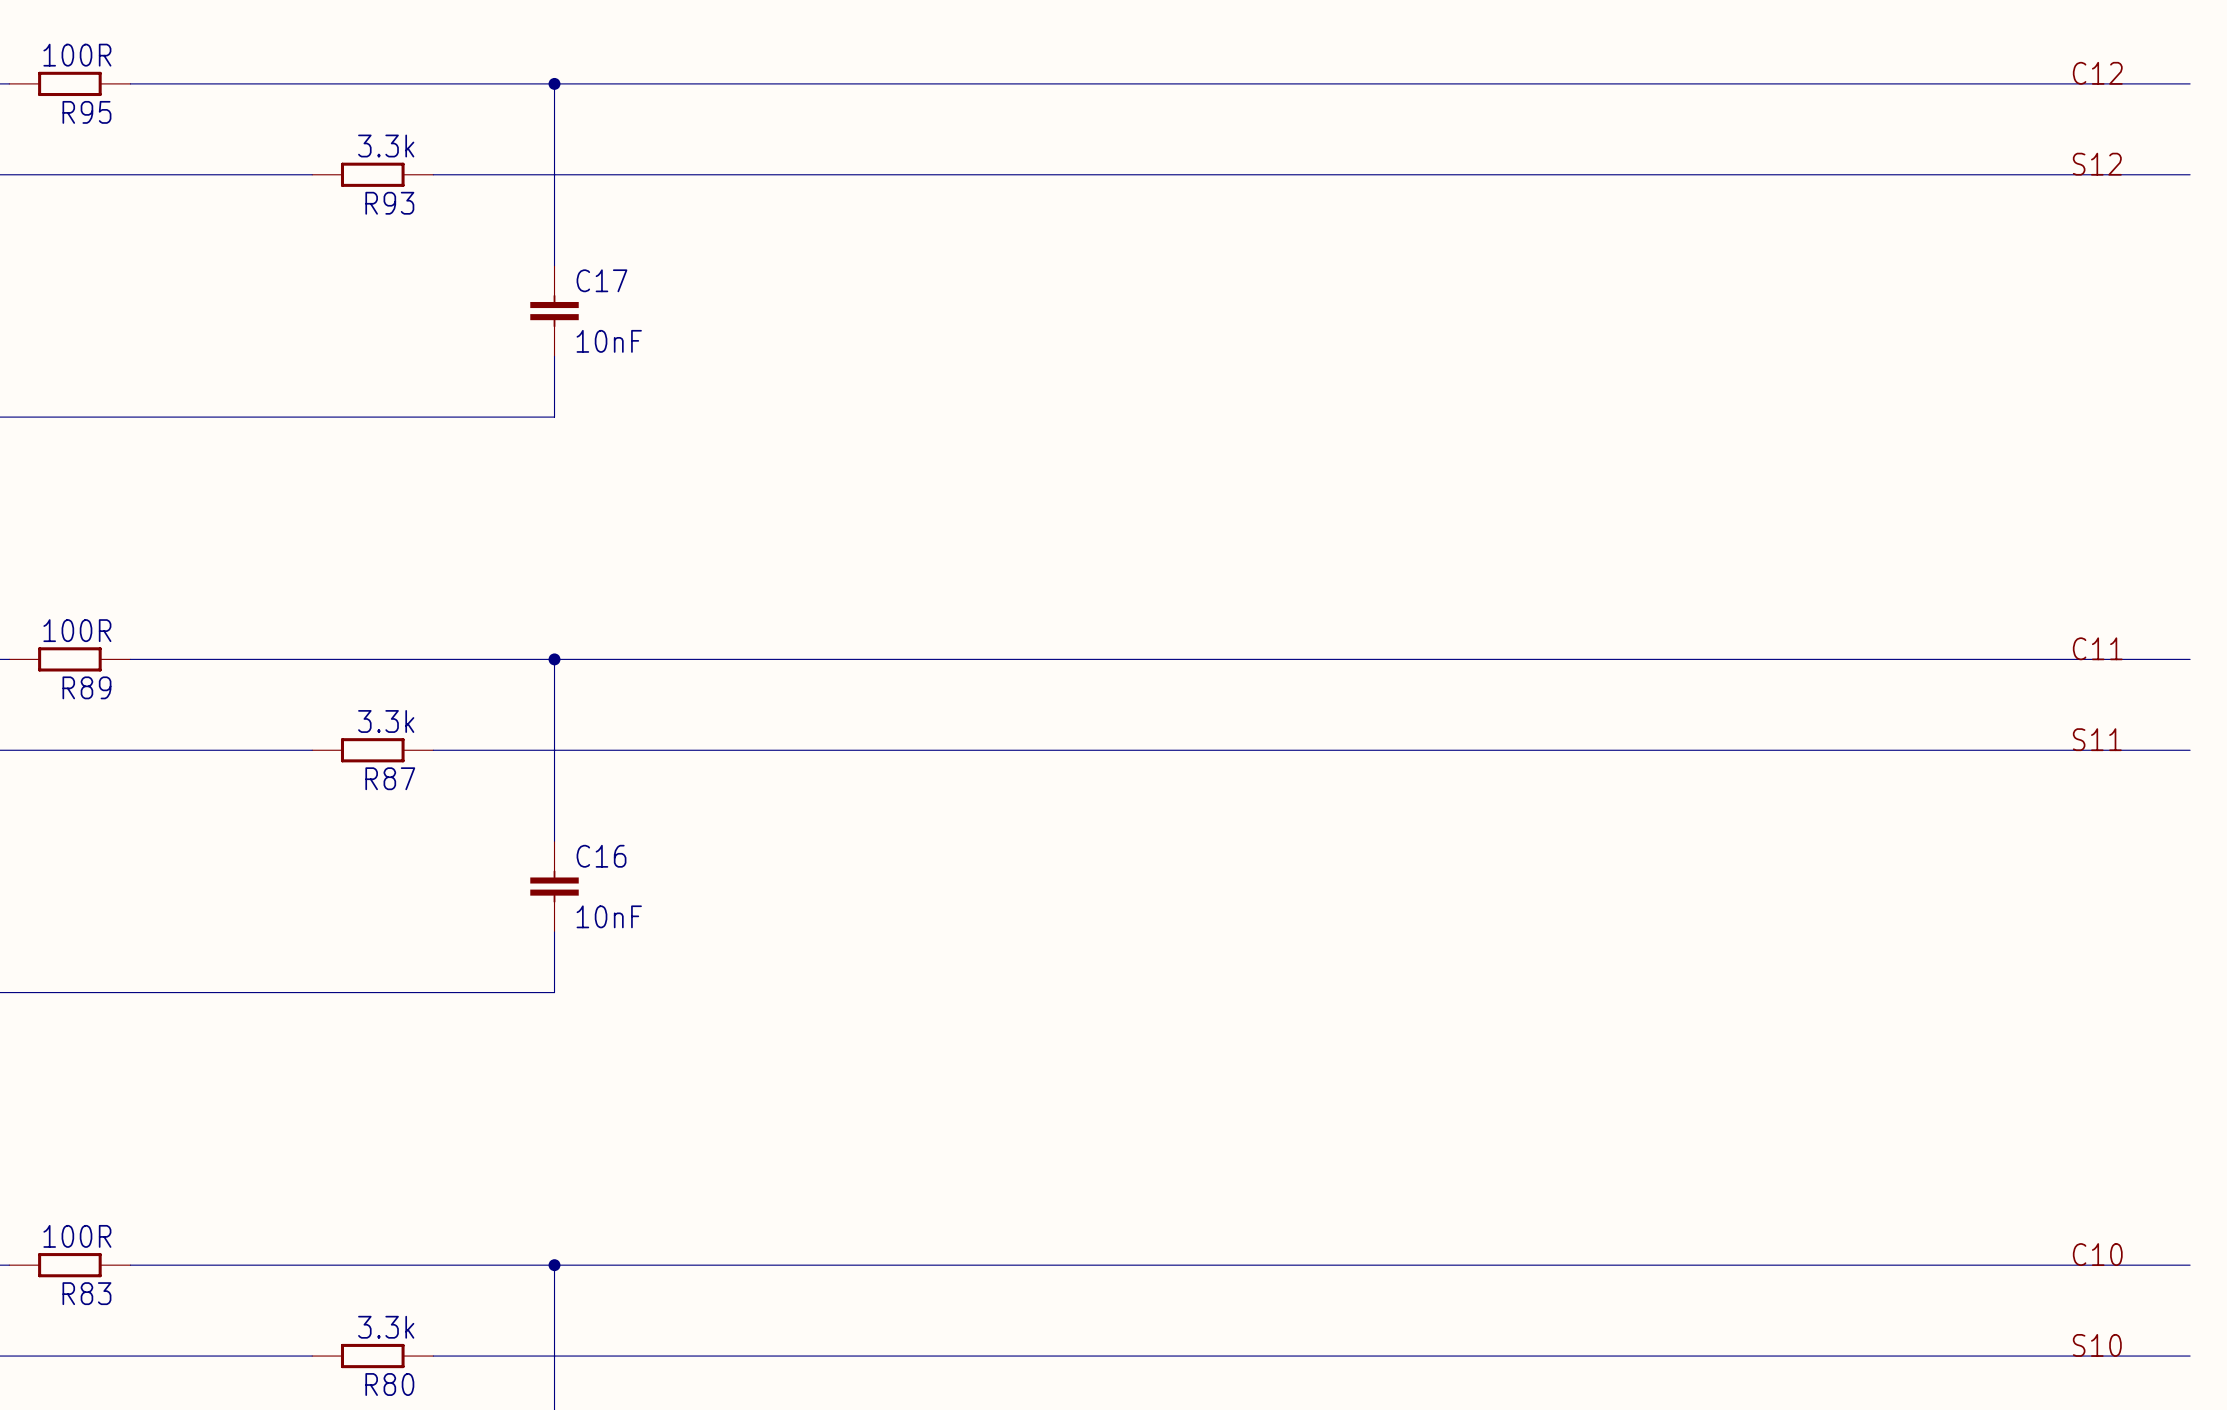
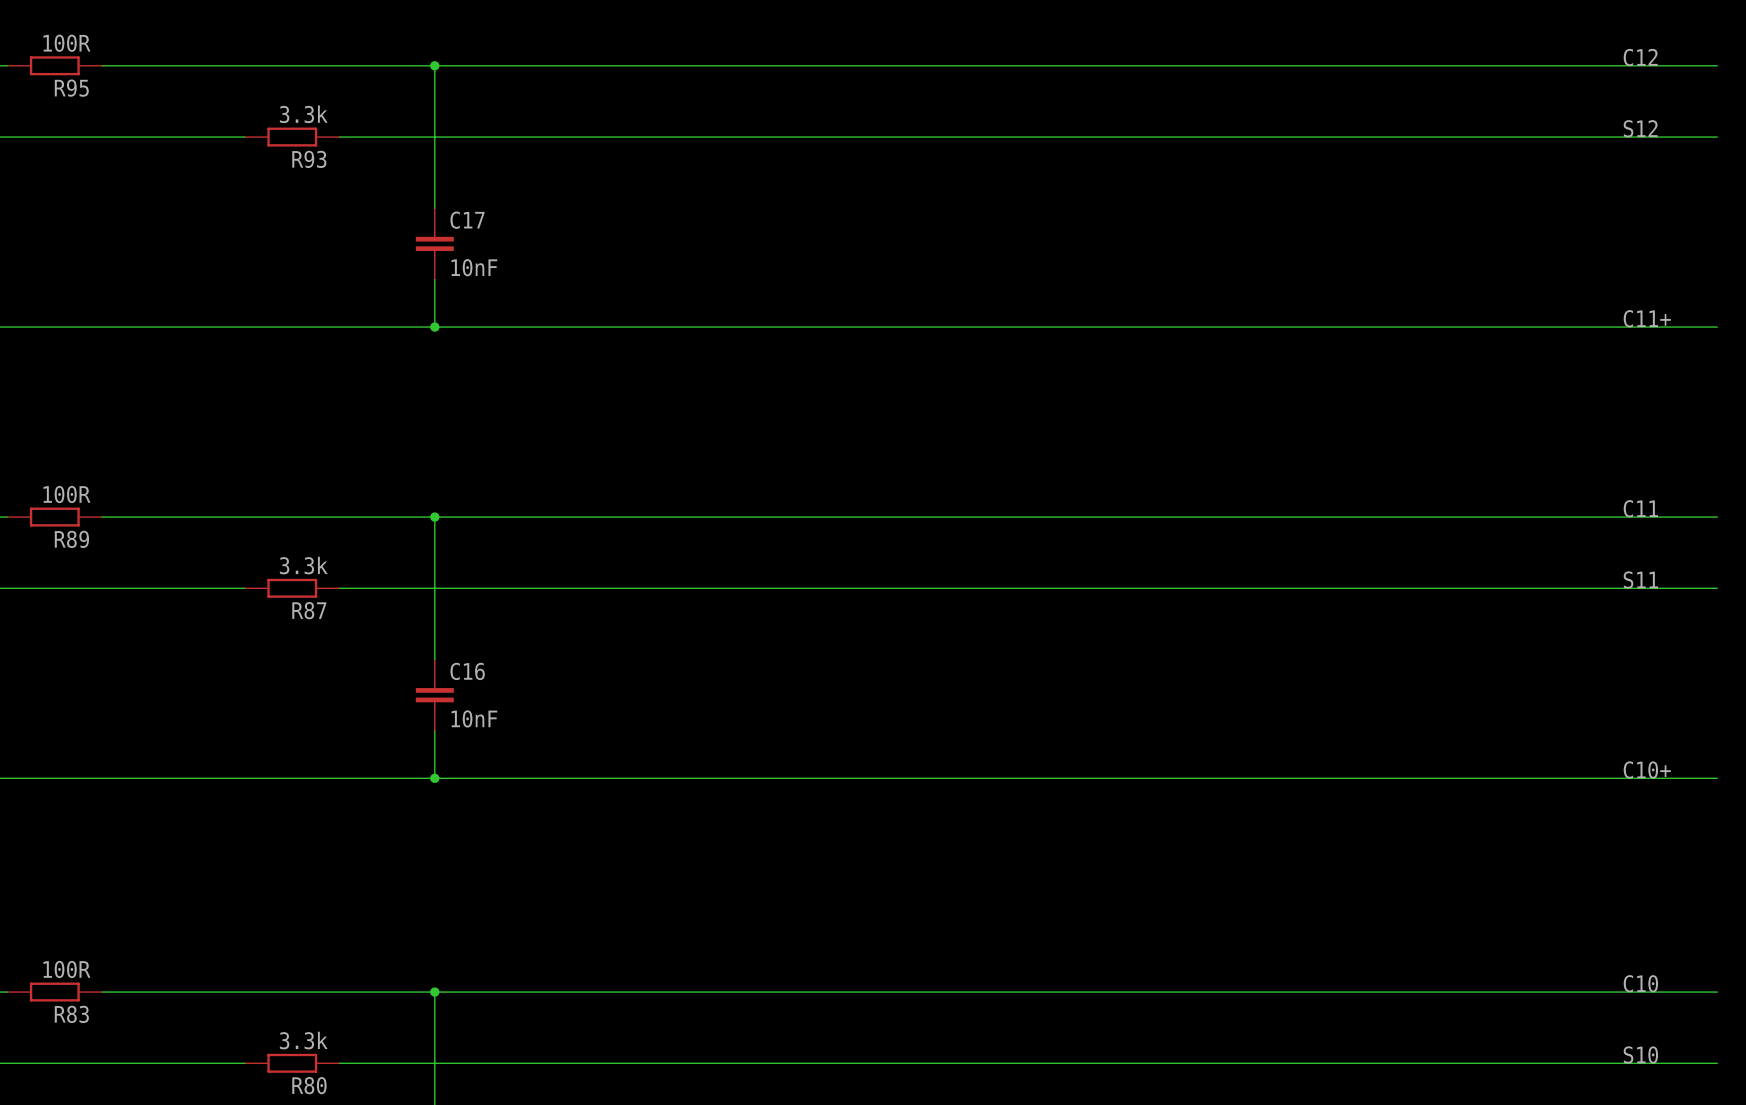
label: none -> C11+ (1647, 318)
wire: none -> (434, 327) (1717, 327)
junction: none -> (434, 327)
label: none -> C10+ (1647, 769)
wire: none -> (434, 778) (1717, 778)
junction: none -> (434, 778)

